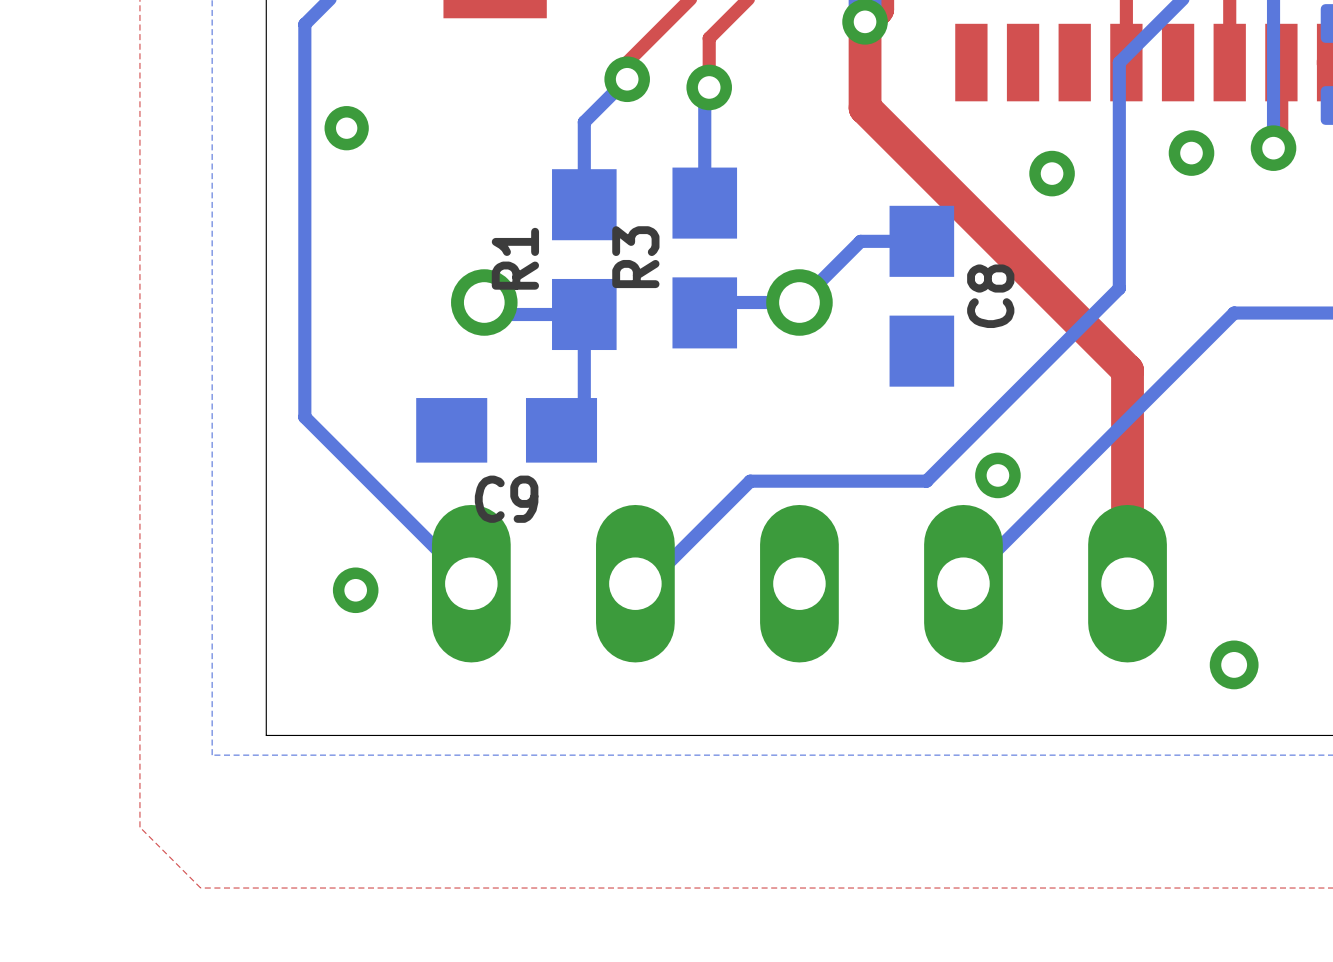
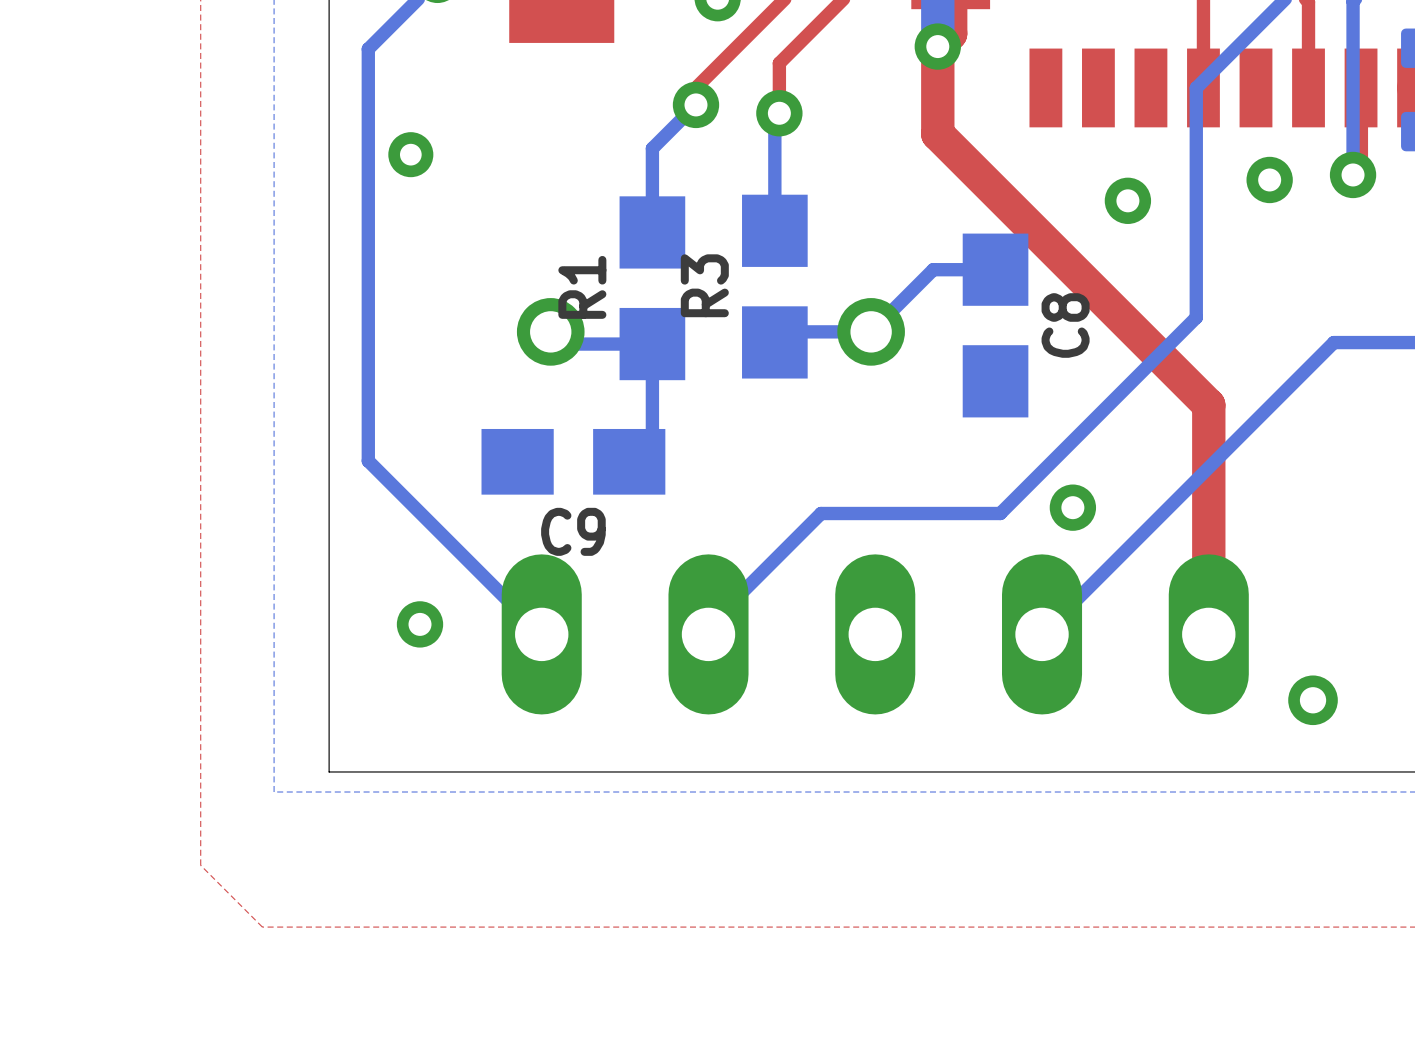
bottom track: (1254, 313) (1234, 313) (963, 583) -> (1333, 342) (1042, 634)
top track: (1127, 370) (1127, 583) -> (1204, 400) (1208, 405) (1208, 634)
bottom track: (304, 417) (471, 583) -> (368, 448) (368, 460) (541, 634)
part position: (799, 583) -> (875, 634)

